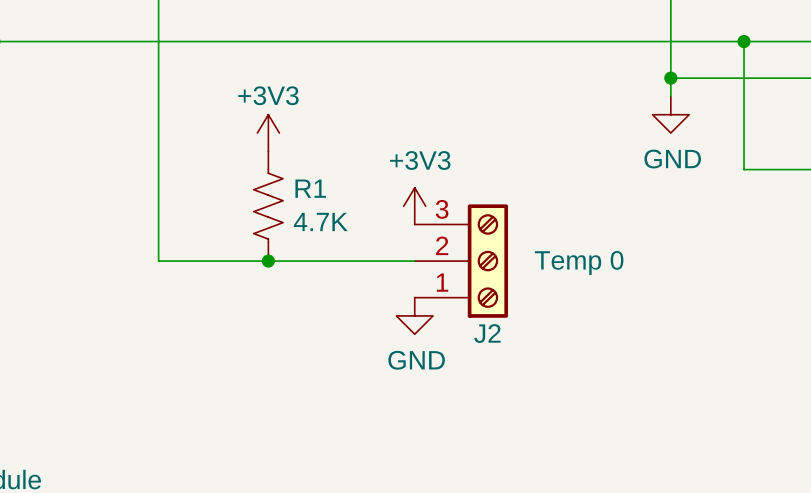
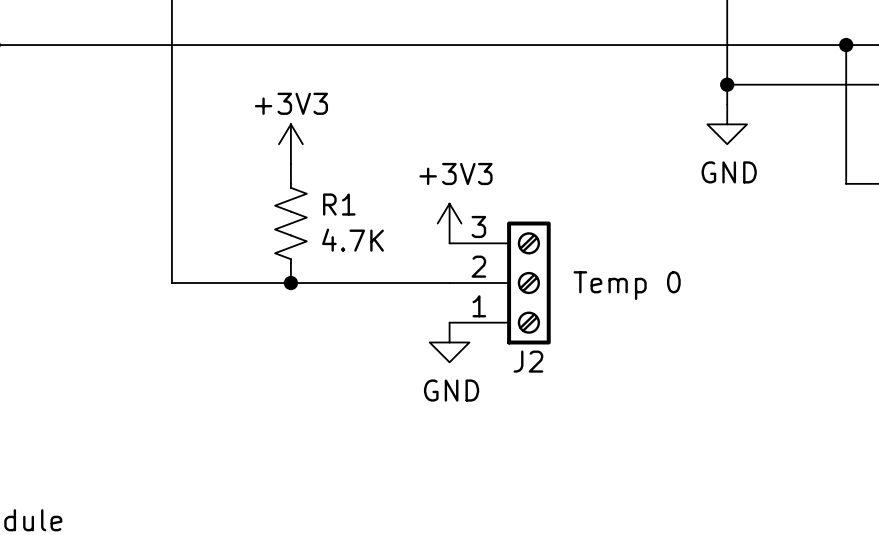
wire: (744, 41) (744, 169) (780, 169) -> (846, 45) (846, 183)
junction position: (744, 41) -> (846, 45)

